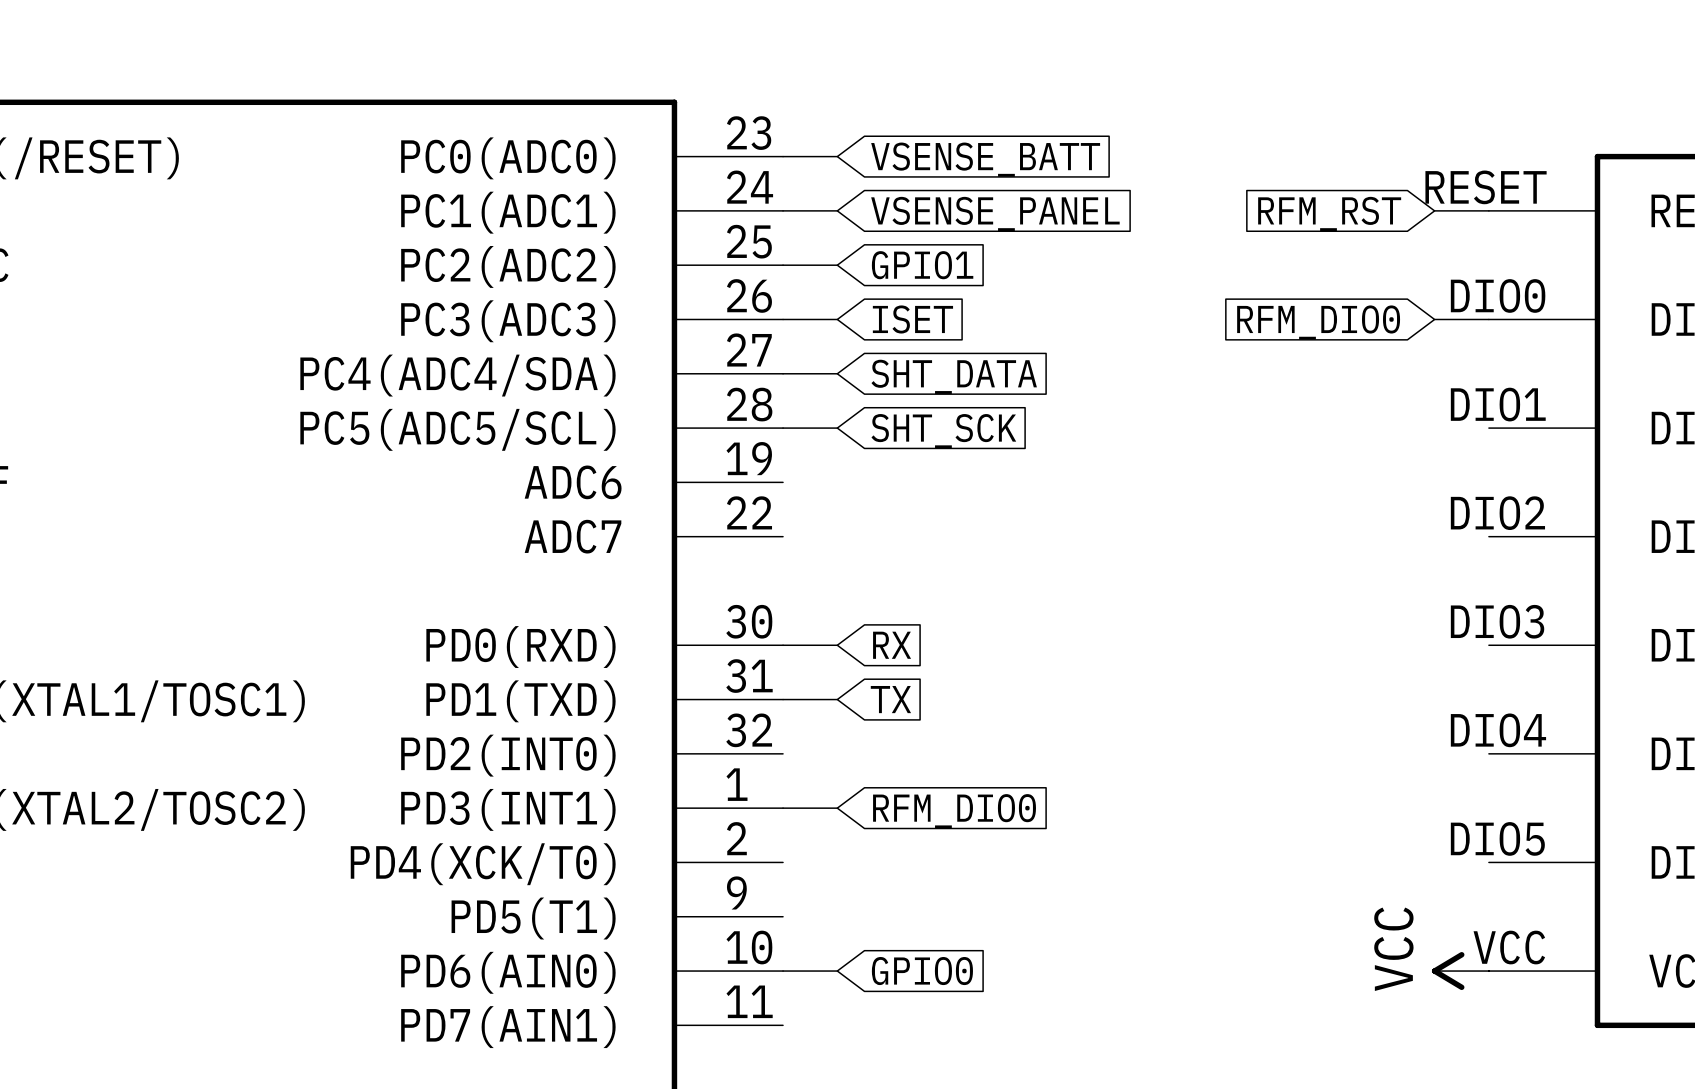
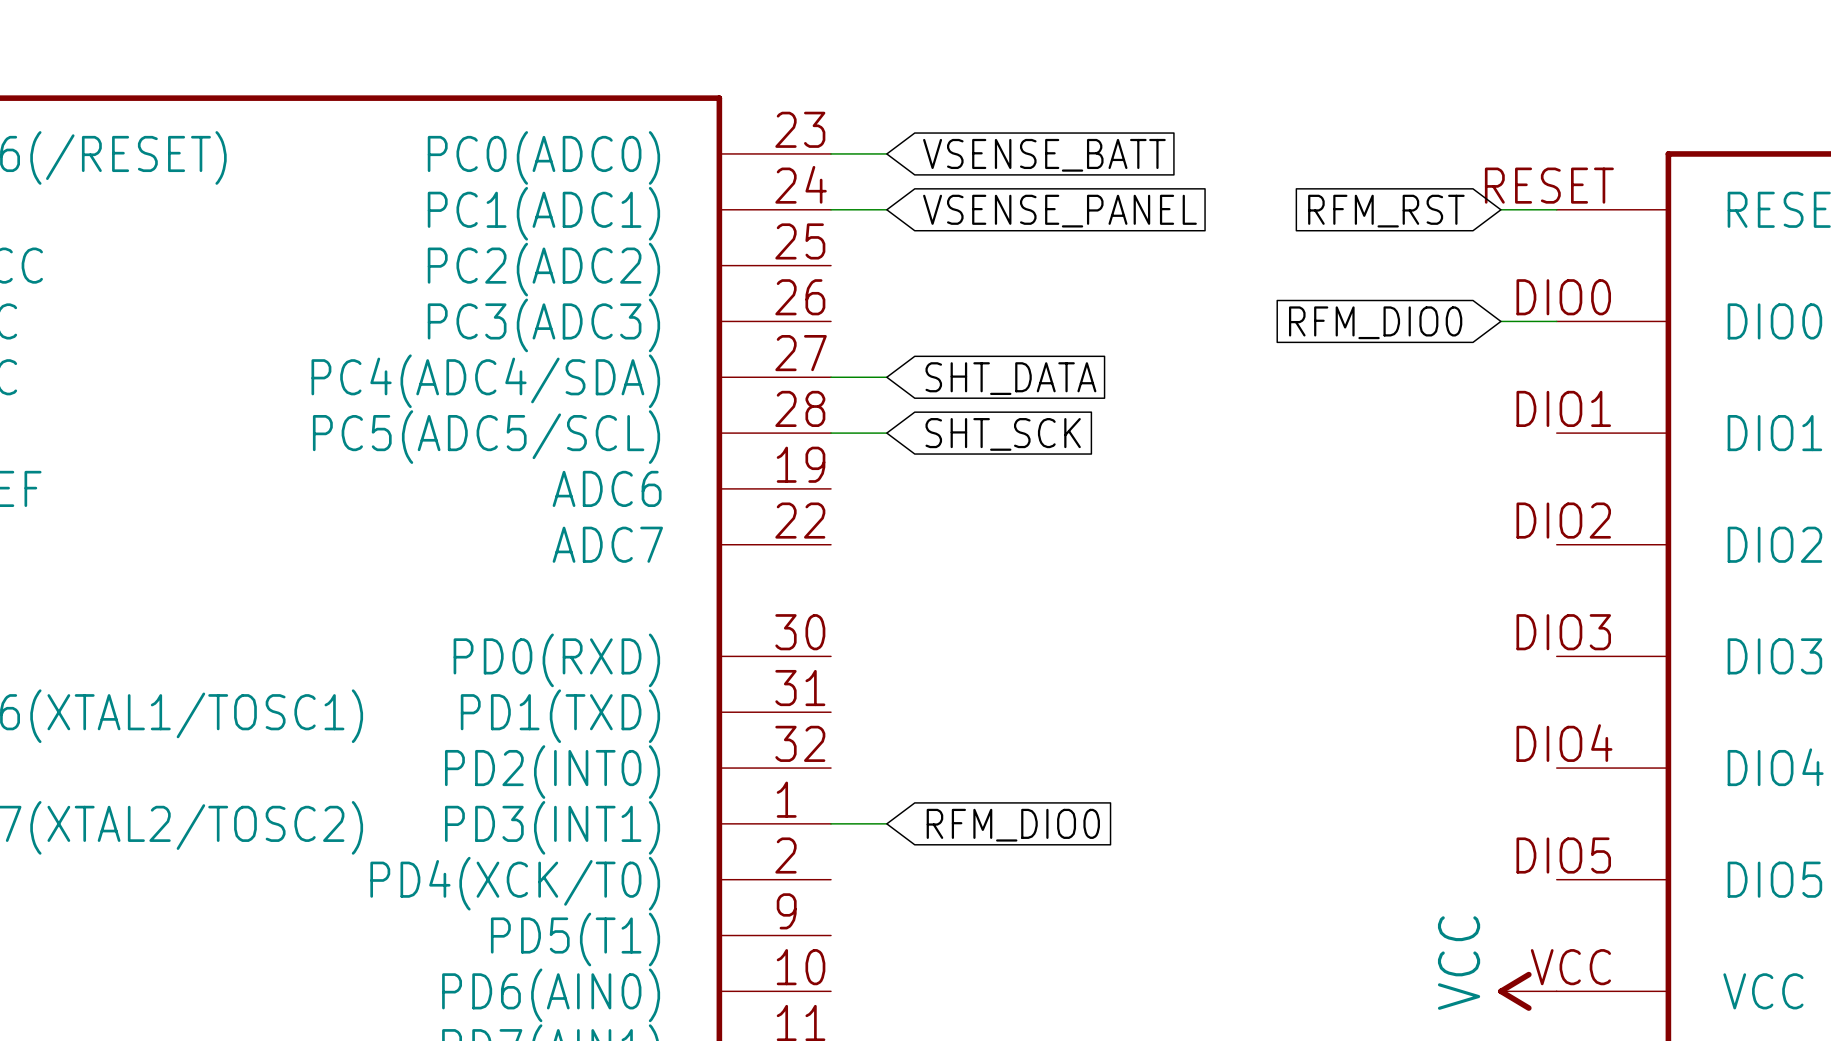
wire: (783, 265) (837, 265) -> none
global label: GPIO1 (922, 265) -> none
wire: (783, 319) (837, 319) -> none
global label: ISET (912, 319) -> none
wire: (783, 645) (837, 645) -> none
global label: RX (892, 645) -> none
wire: (783, 699) (837, 699) -> none
global label: TX (890, 699) -> none
wire: (783, 971) (837, 971) -> none
global label: GPIO0 (922, 971) -> none

